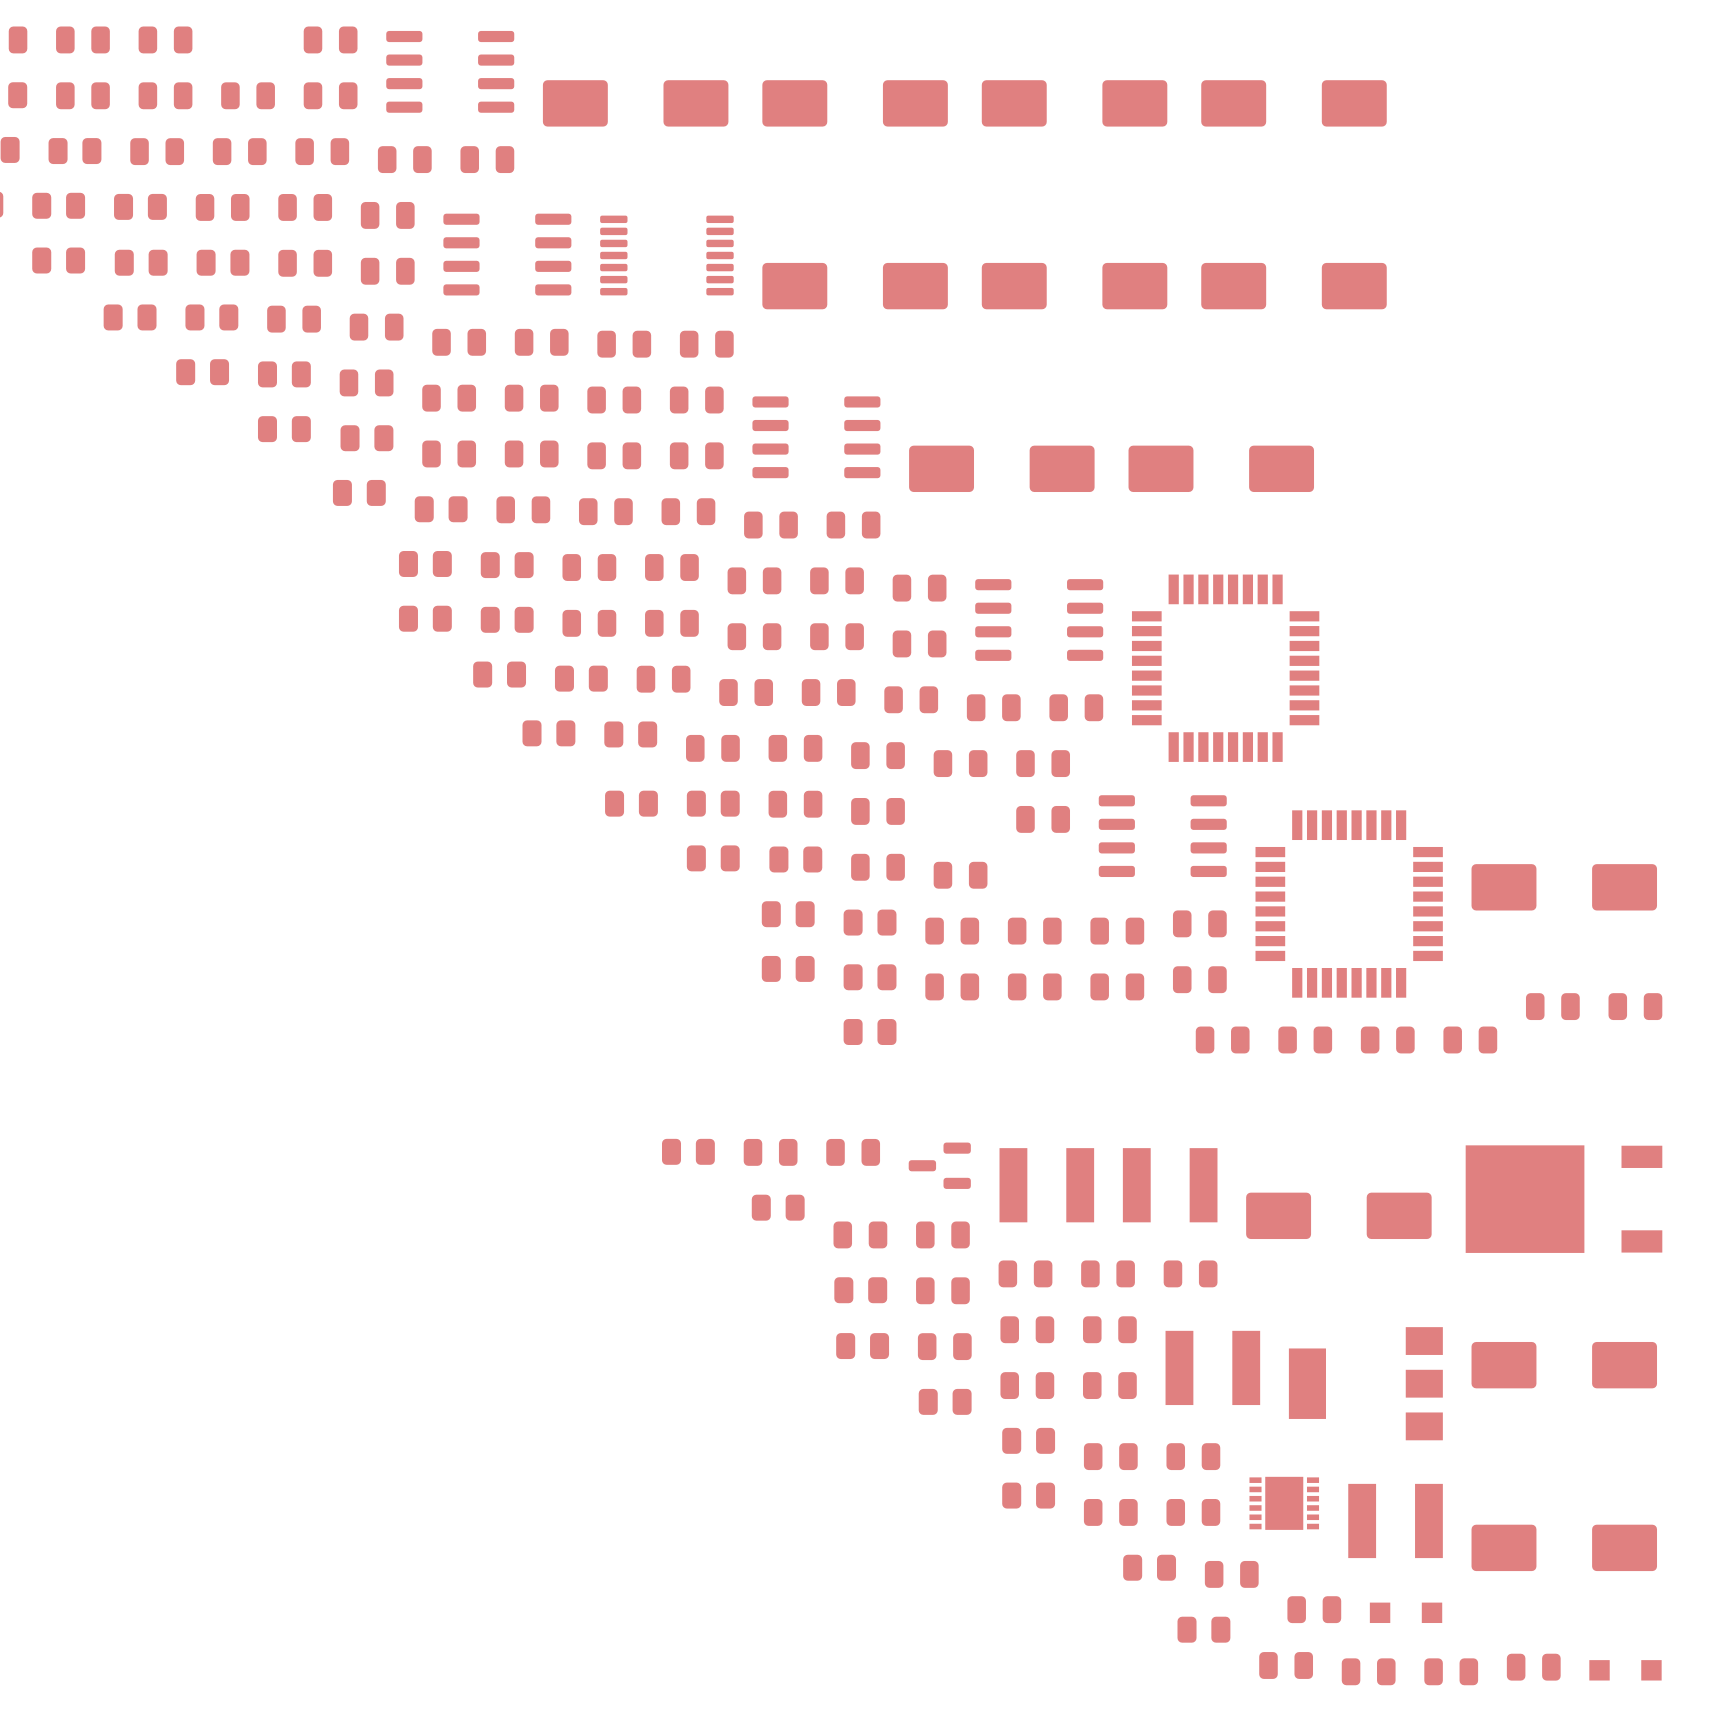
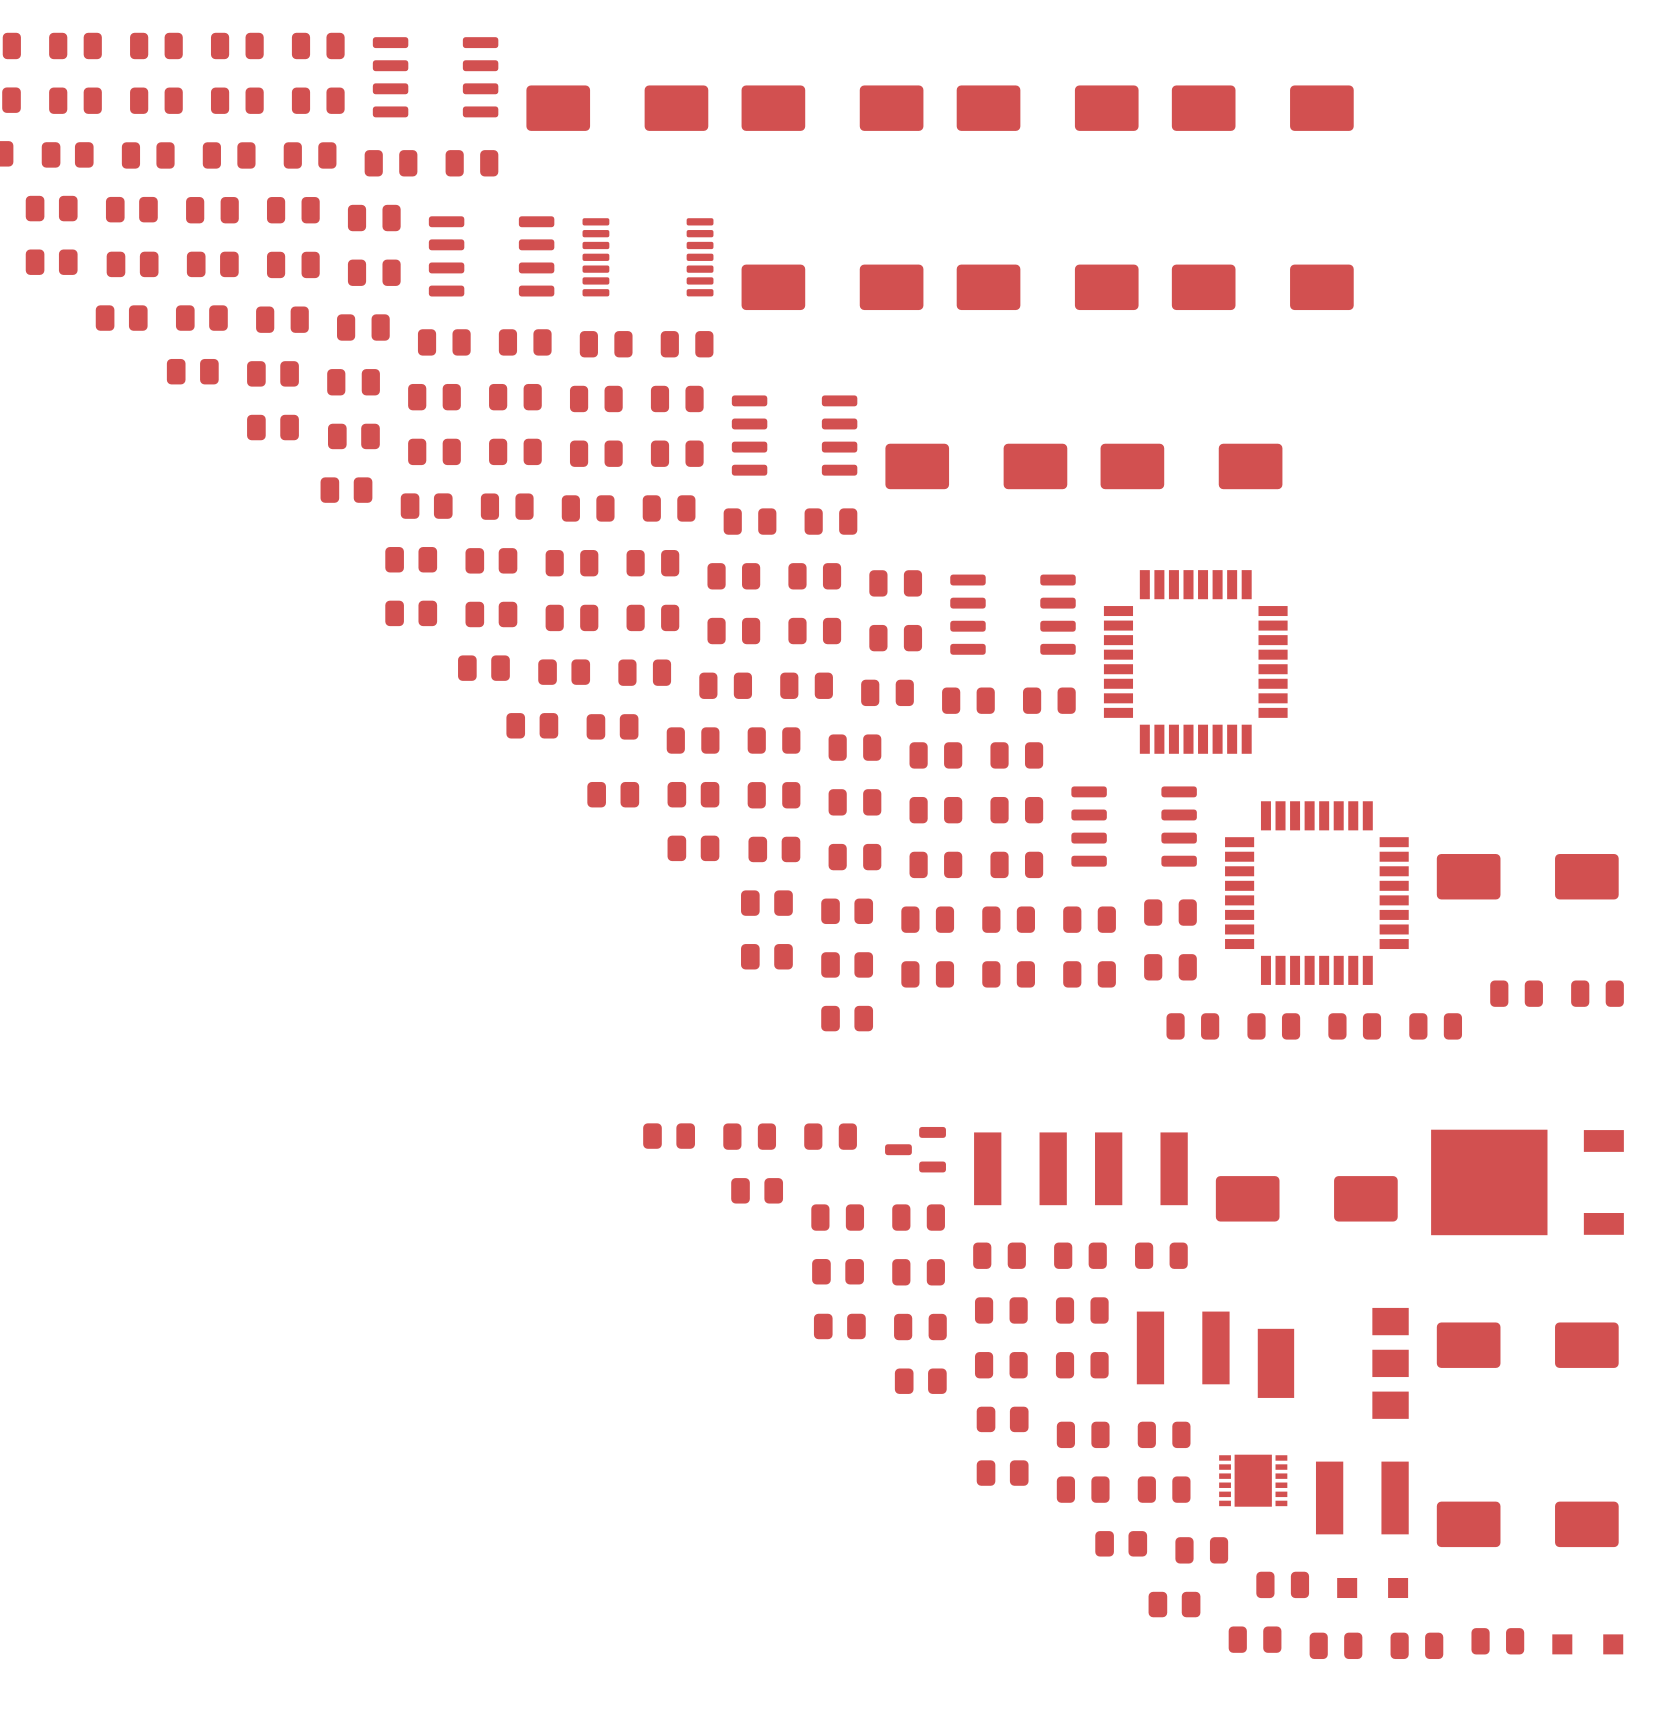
part: none -> (237, 45)
part: none -> (935, 810)
part: none -> (1016, 864)

